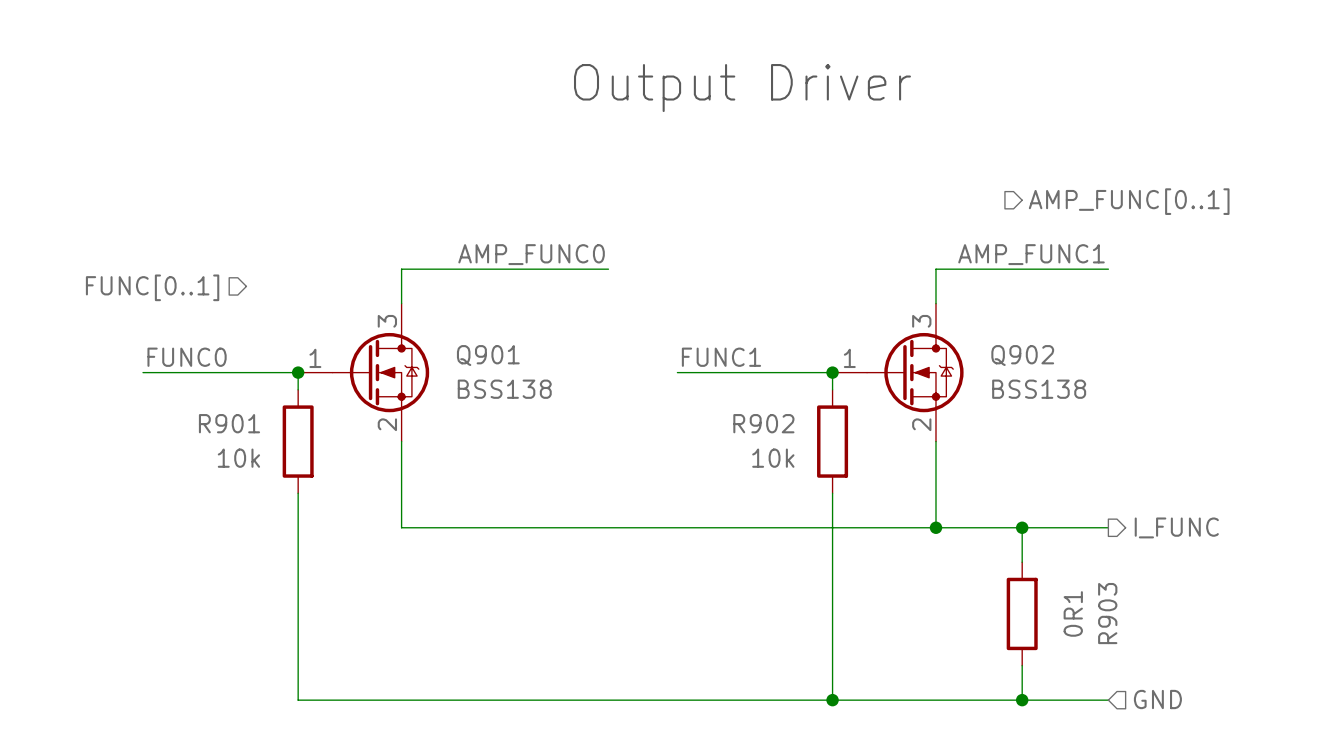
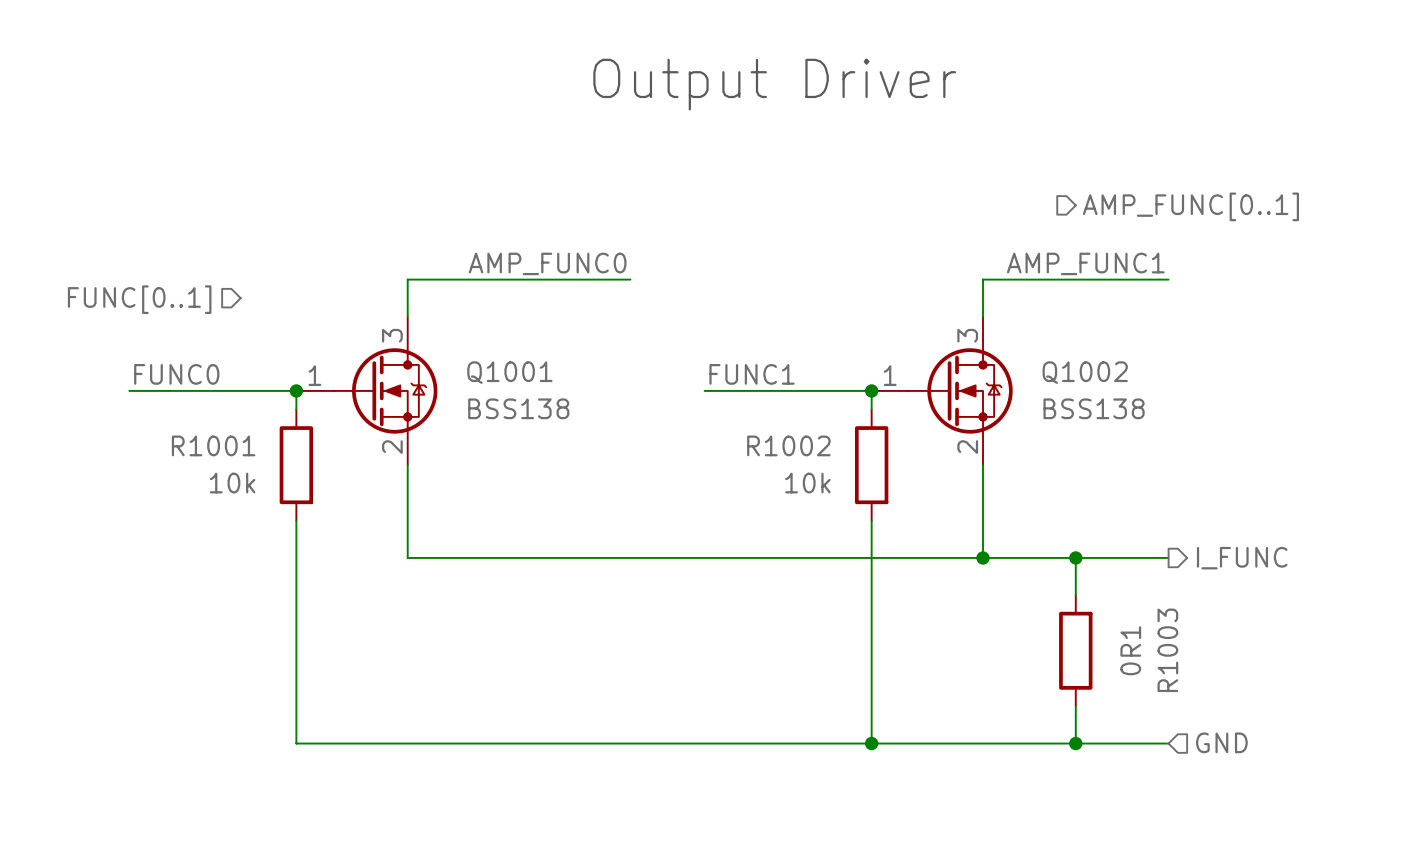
Q901 name: Q901 (488, 355) -> Q1001 (509, 372)
Q902 name: Q902 (1022, 355) -> Q1002 (1085, 372)
R901 name: R901 (229, 423) -> R1001 (213, 445)
R902 name: R902 (763, 423) -> R1002 (788, 445)
R903 name: R903 (1107, 613) -> R1003 (1167, 650)

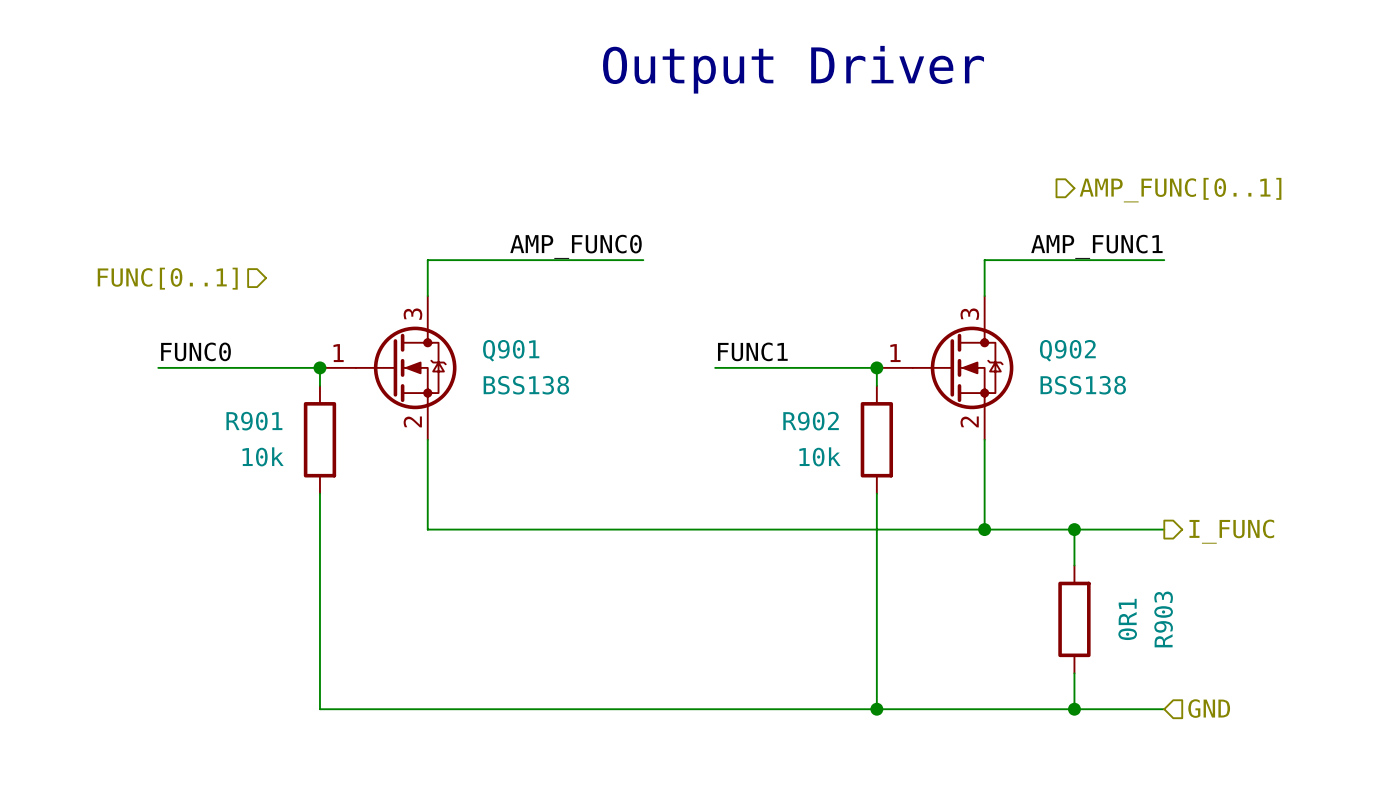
Q1001 name: Q1001 (509, 372) -> Q901 (511, 350)
Q1002 name: Q1002 (1085, 372) -> Q902 (1067, 350)
R1001 name: R1001 (213, 445) -> R901 (254, 421)
R1002 name: R1002 (788, 445) -> R902 (811, 421)
R1003 name: R1003 (1167, 650) -> R903 (1163, 619)

